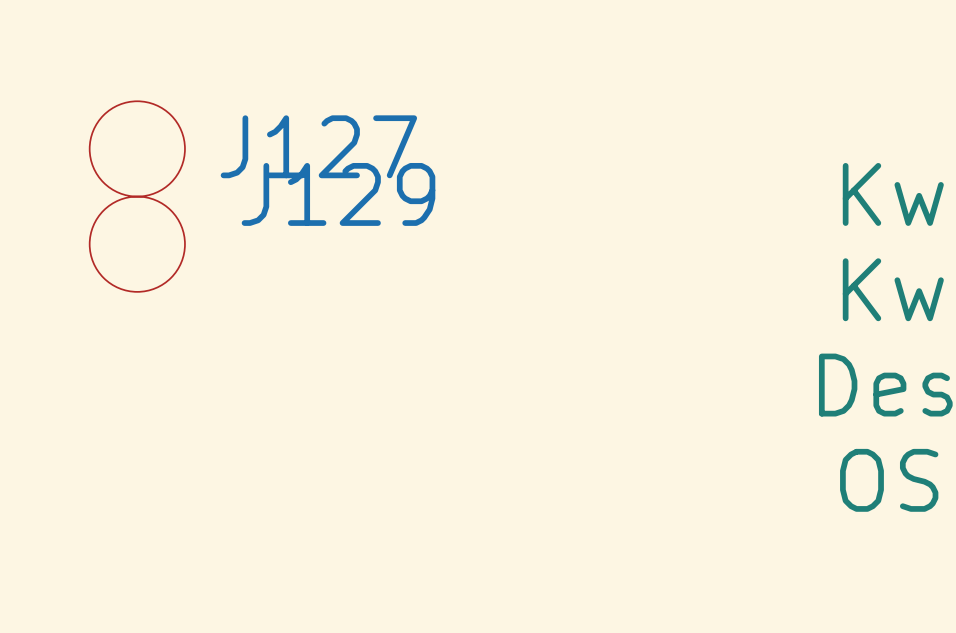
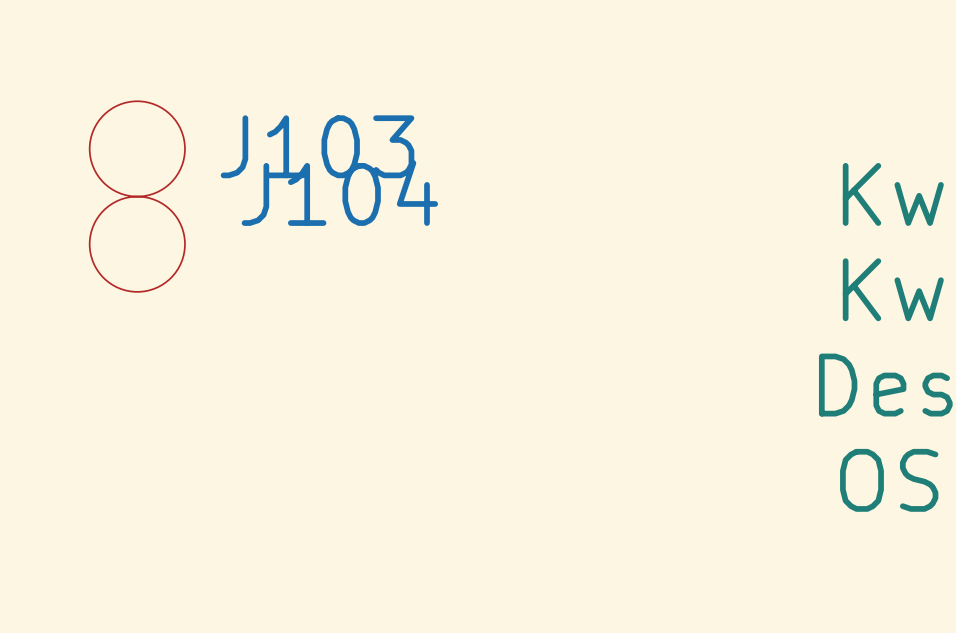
J127 name: J127 (318, 146) -> J103 (317, 146)
J129 name: J129 (338, 194) -> J104 (339, 193)

